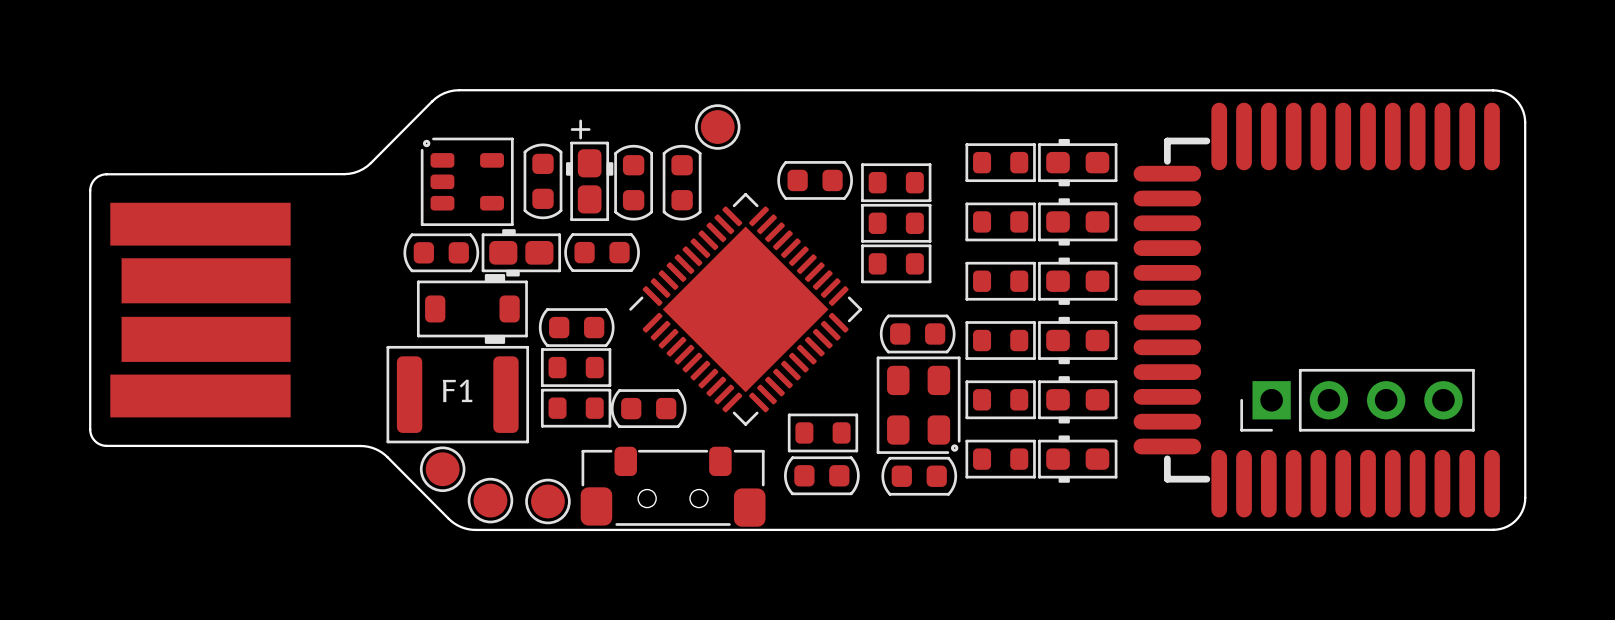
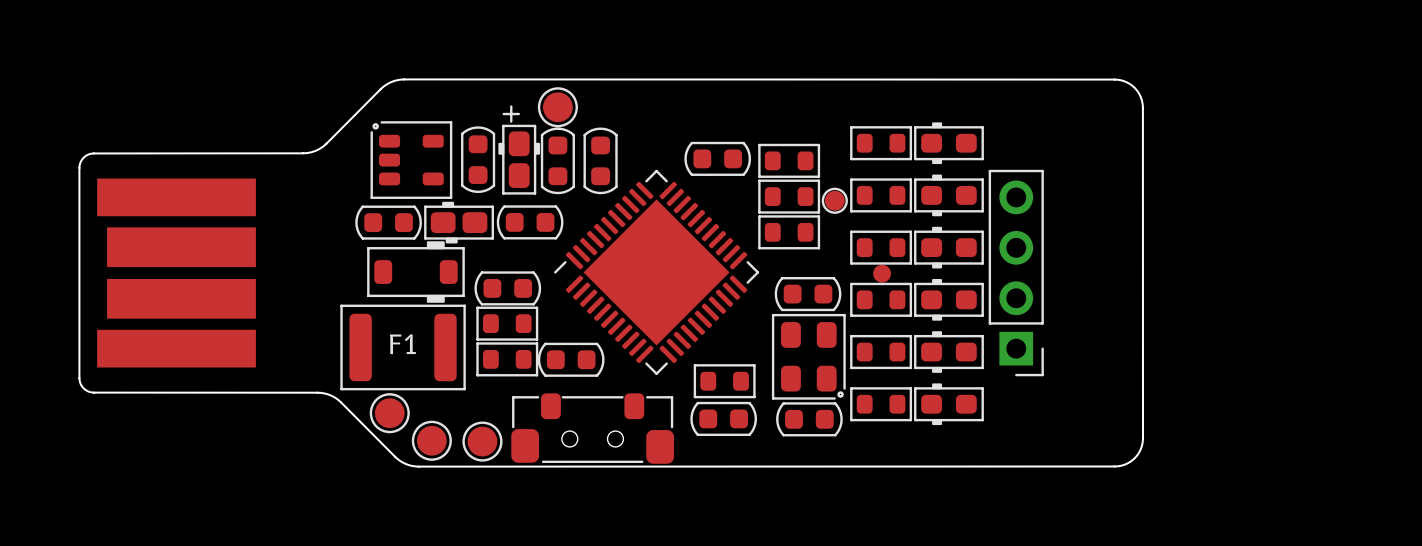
board edge: (459, 90) (1493, 90) (1510, 95) (1520, 105) (1525, 122) (1525, 497) (1520, 514) (1510, 524) (1496, 529) (1266, 529) -> (404, 79) (1114, 79) (1128, 83) (1139, 93) (1142, 107) (1142, 438) (1140, 449) (1134, 458) (1125, 464) (1114, 466)
part position: (717, 127) -> (557, 107)
part: none -> (834, 200)
part: none -> (882, 273)
part: (1316, 310) -> none
part rotation: 0° (1357, 400) -> 90° counterclockwise (1016, 273)
part position: (1357, 400) -> (1016, 273)

